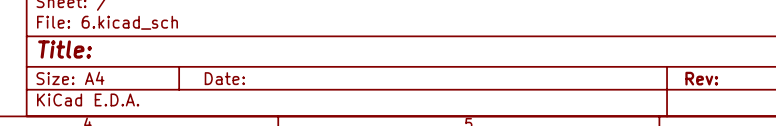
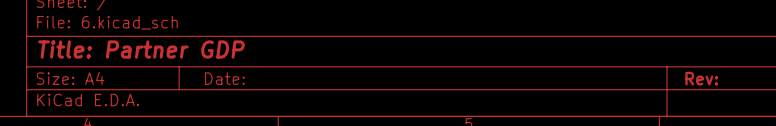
title block: Title: (65, 49) -> Title: Partner GDP (141, 49)

